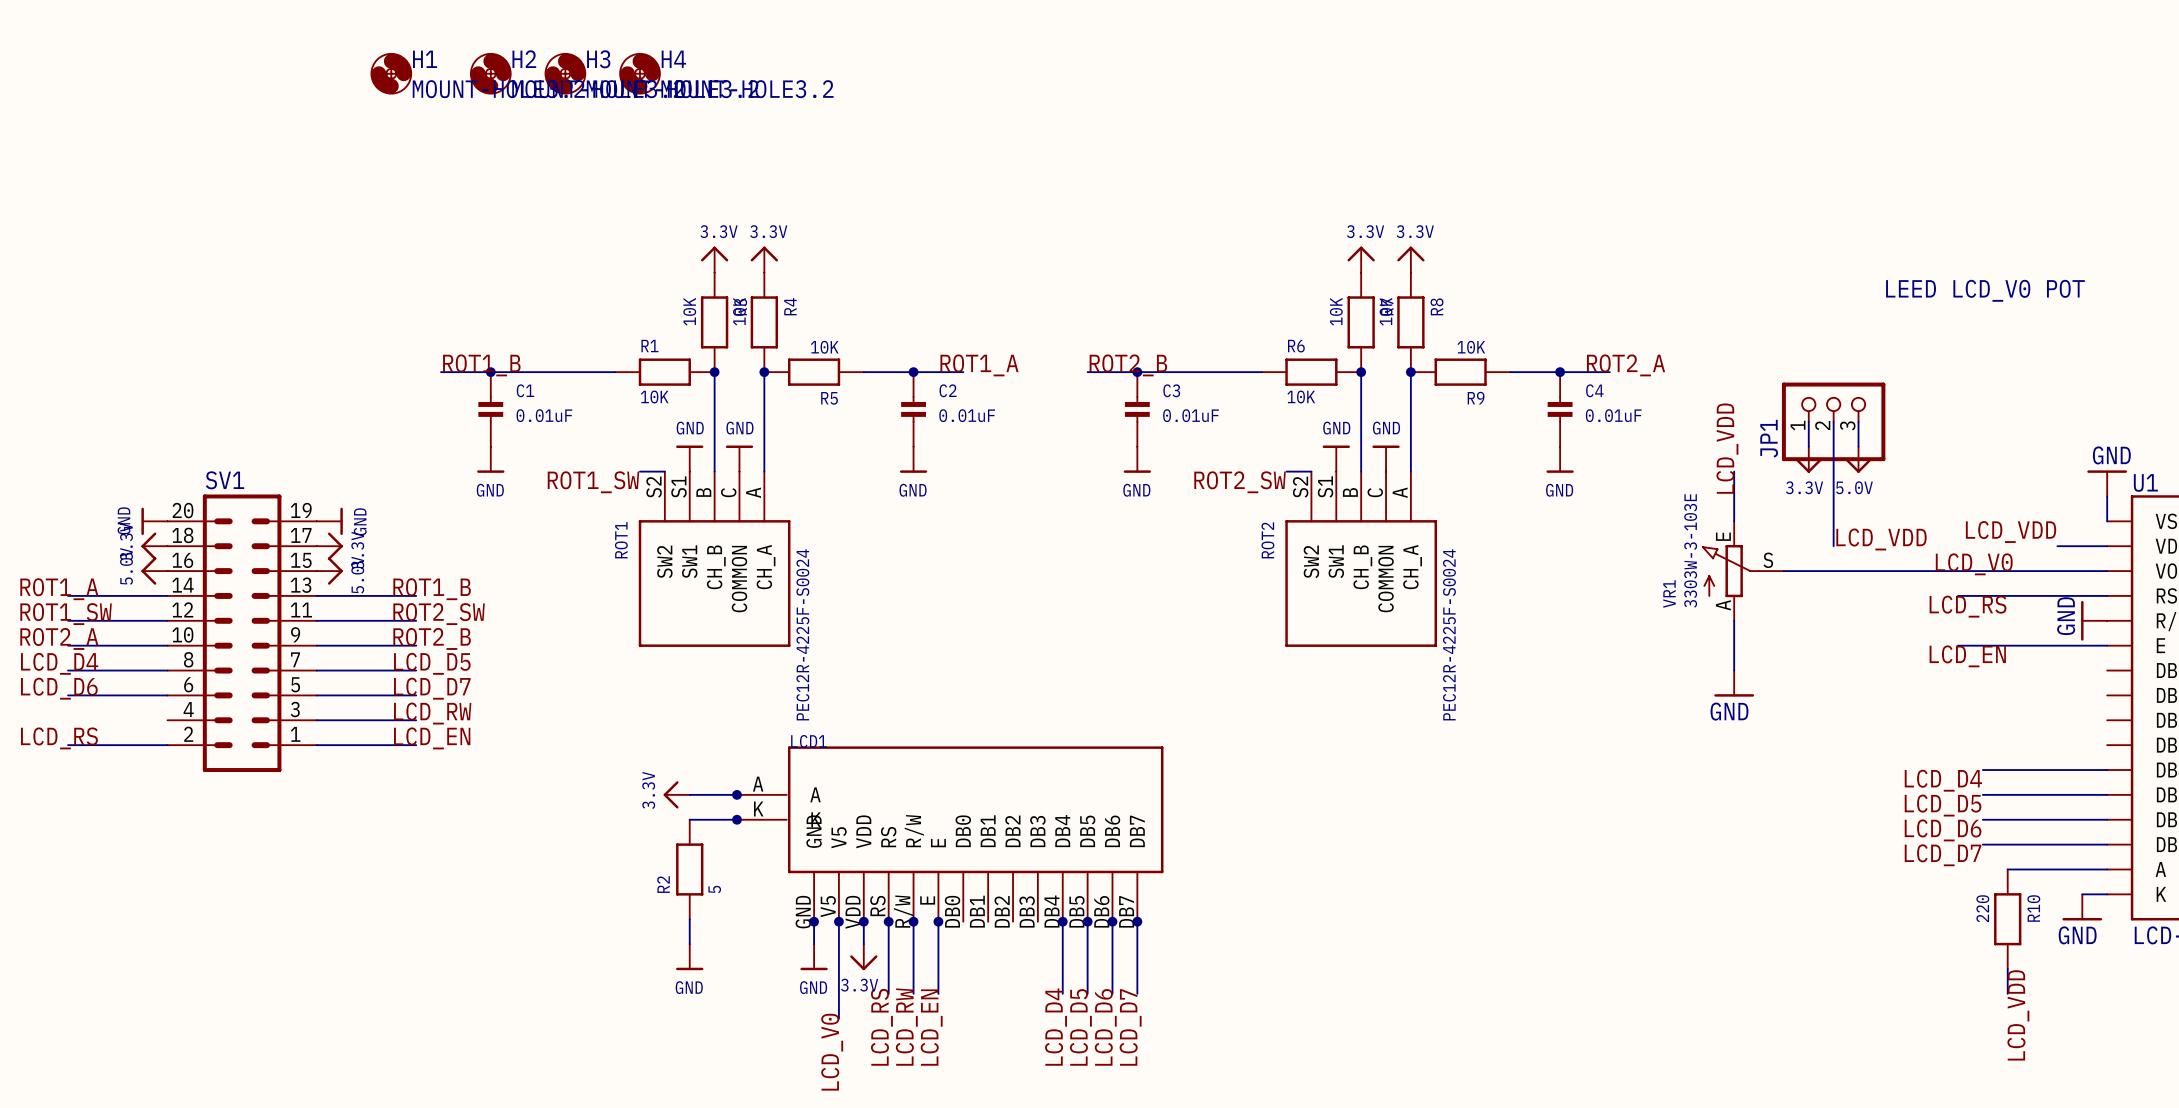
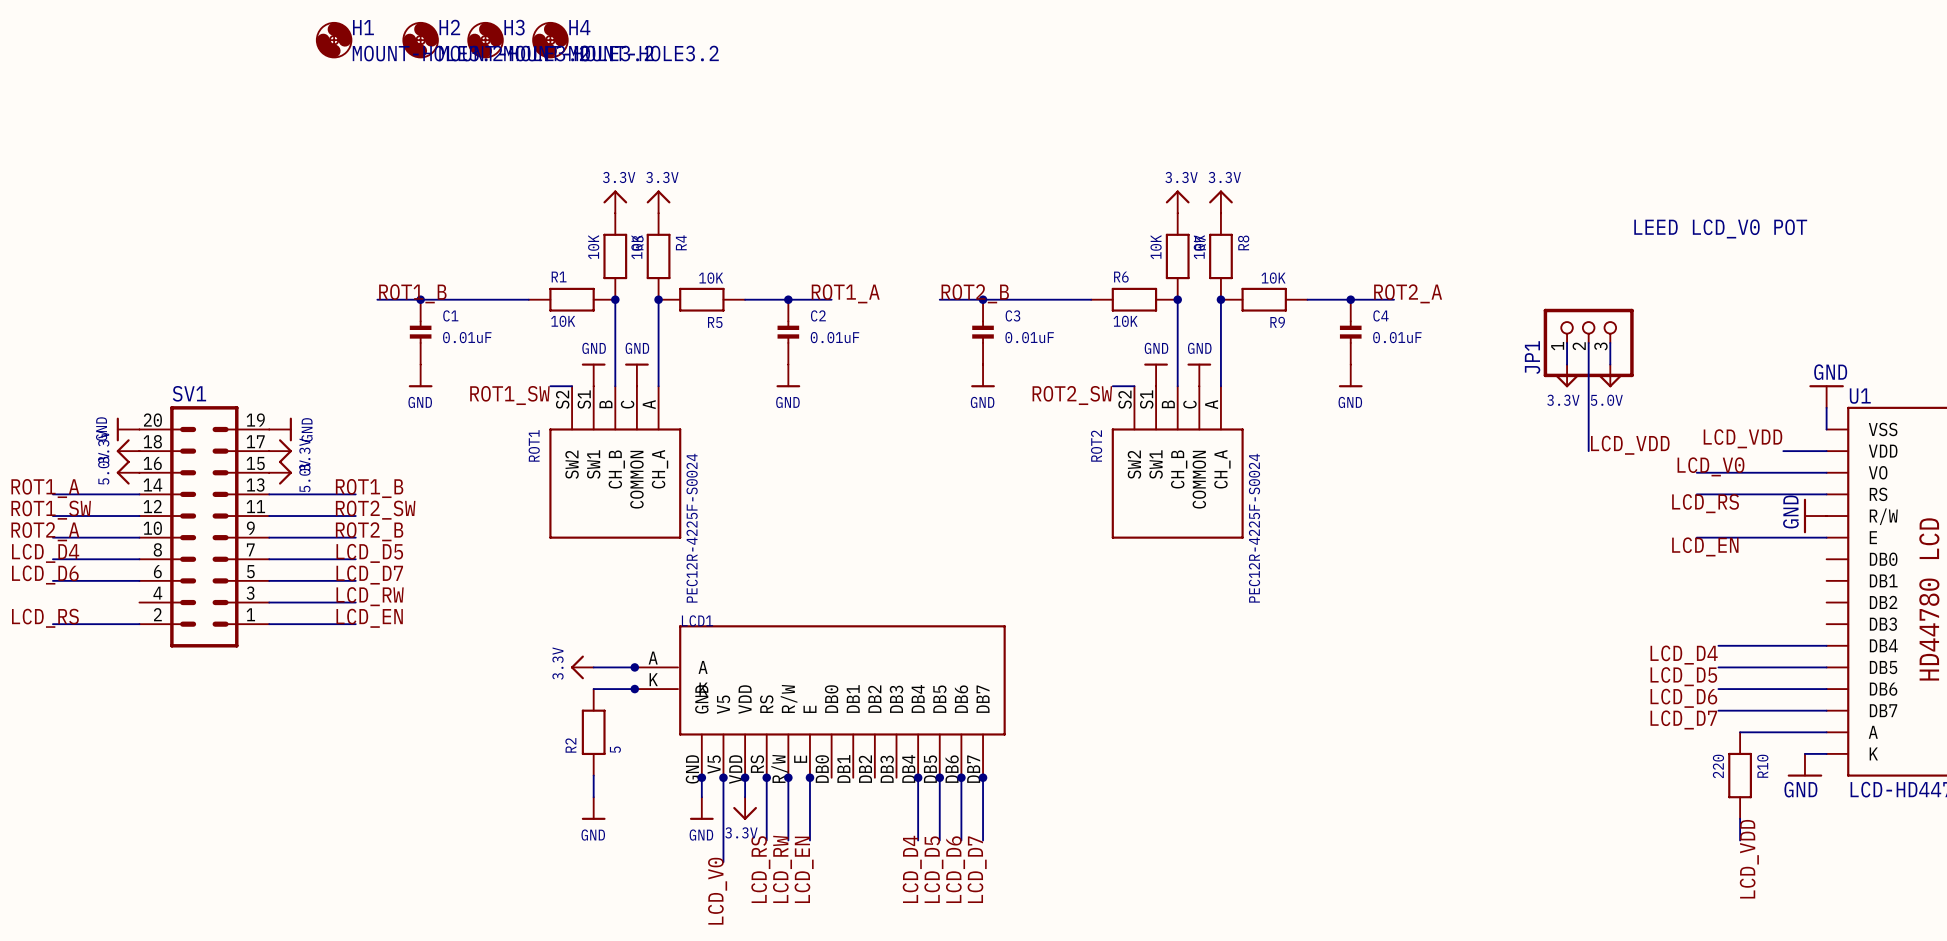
label: LCD_VDD (1727, 448) -> none
wire: (1734, 471) (1734, 521) -> none
VR1: 3303W-3-103E (1743, 571) -> none
wire: (1783, 571) (1957, 571) -> none
wire: (1734, 620) (1734, 670) -> none
power symbol: GND (1734, 683) -> none

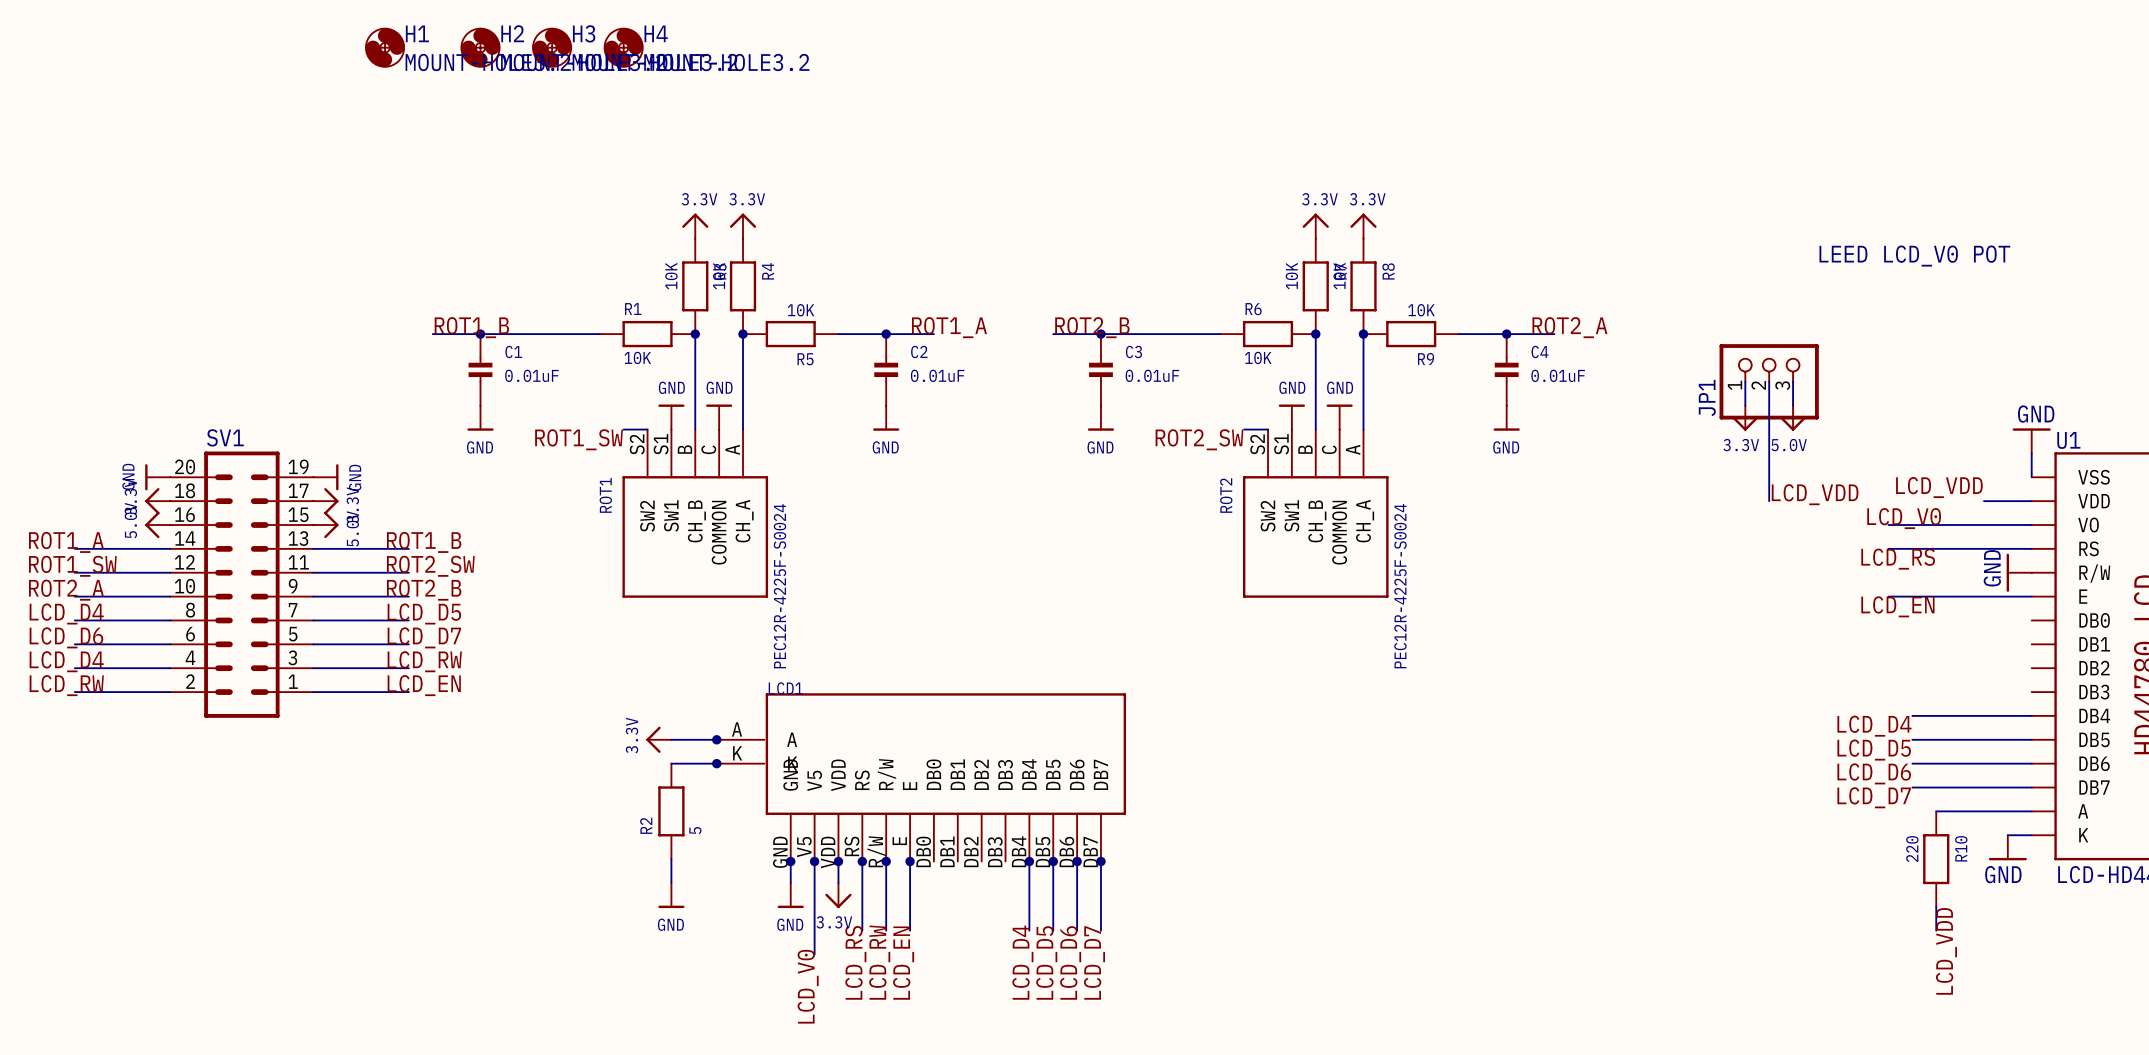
label: none -> LCD_D4 (66, 661)
wire: none -> (74, 668) (170, 668)
label: LCD_RS (45, 618) -> LCD_RW (66, 685)

